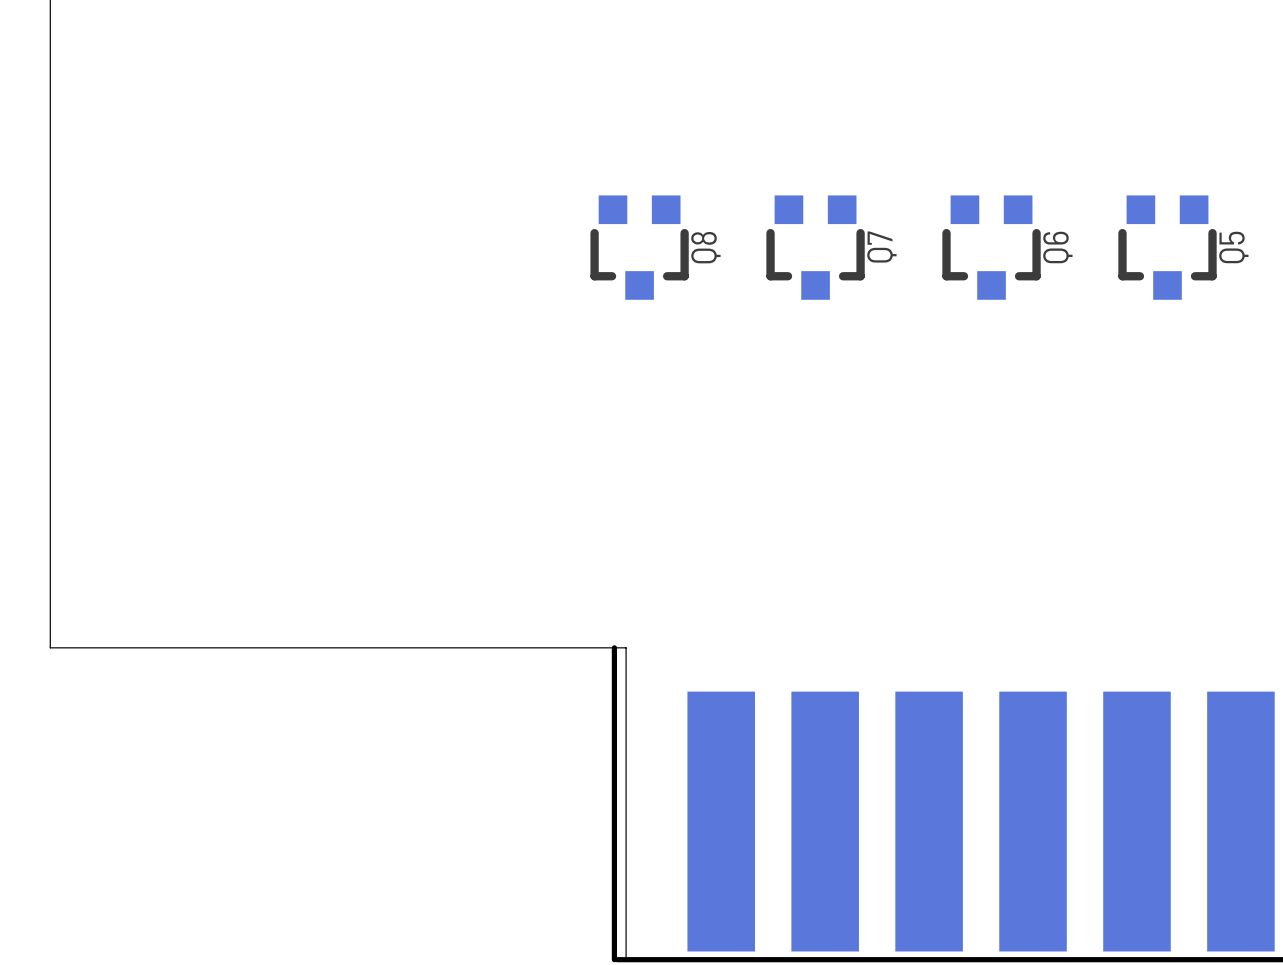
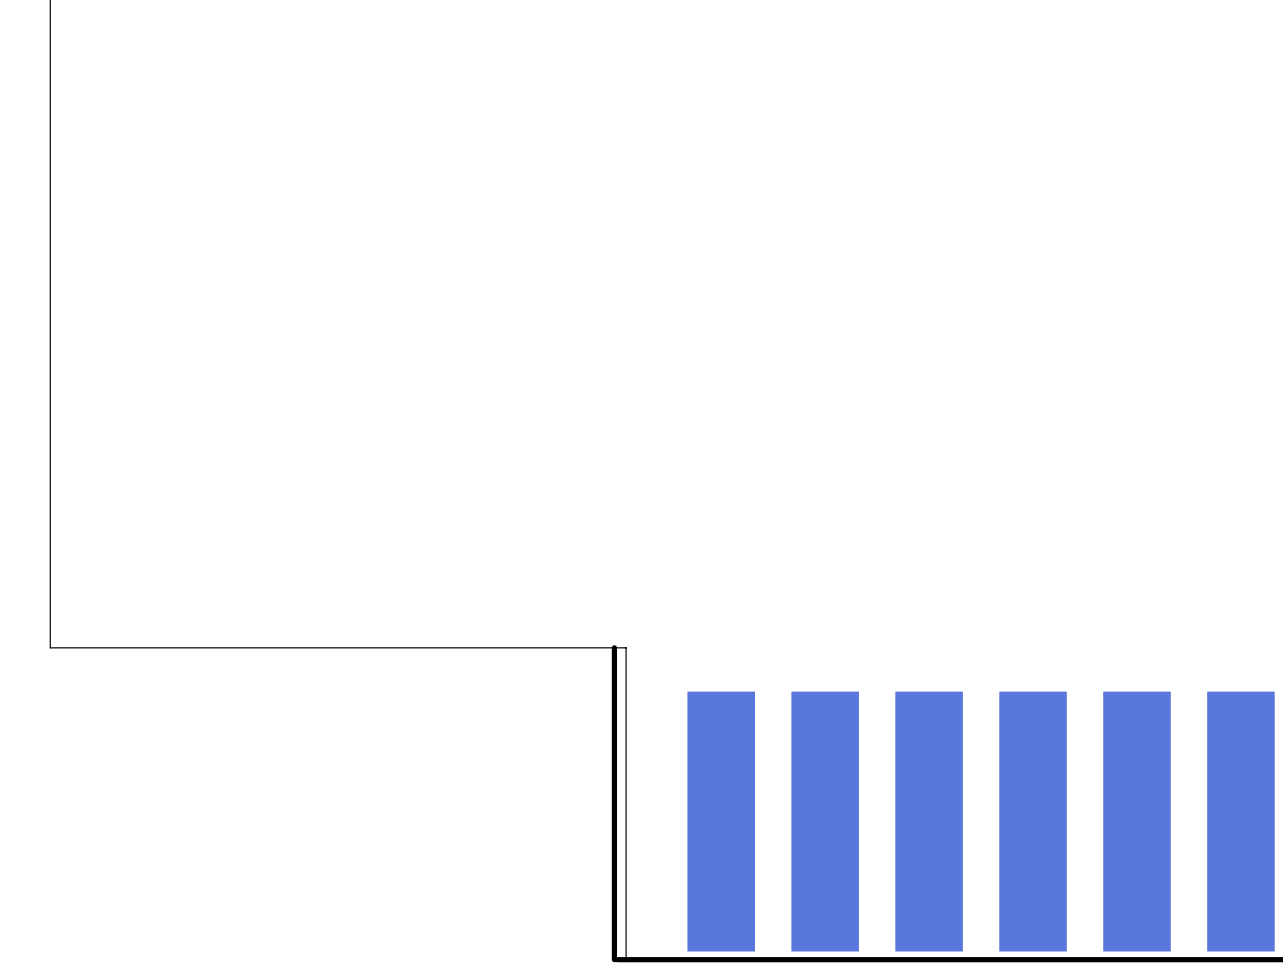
Q8: (639, 247) -> none
Q7: (815, 247) -> none
Q6: (991, 247) -> none
Q5: (1167, 247) -> none

